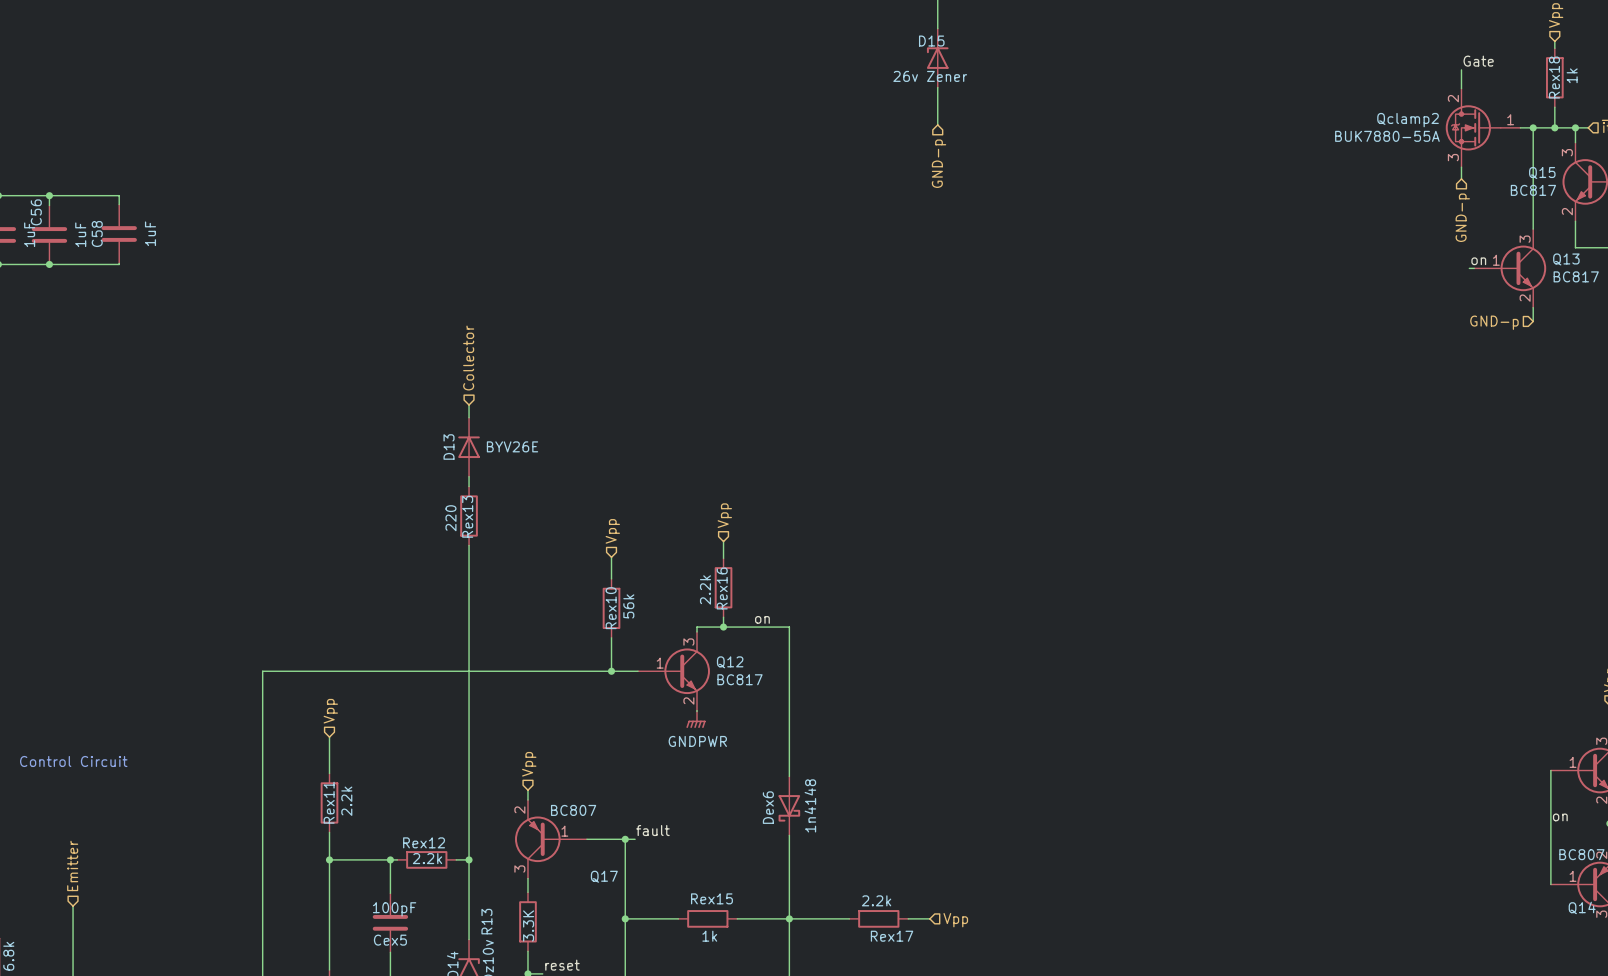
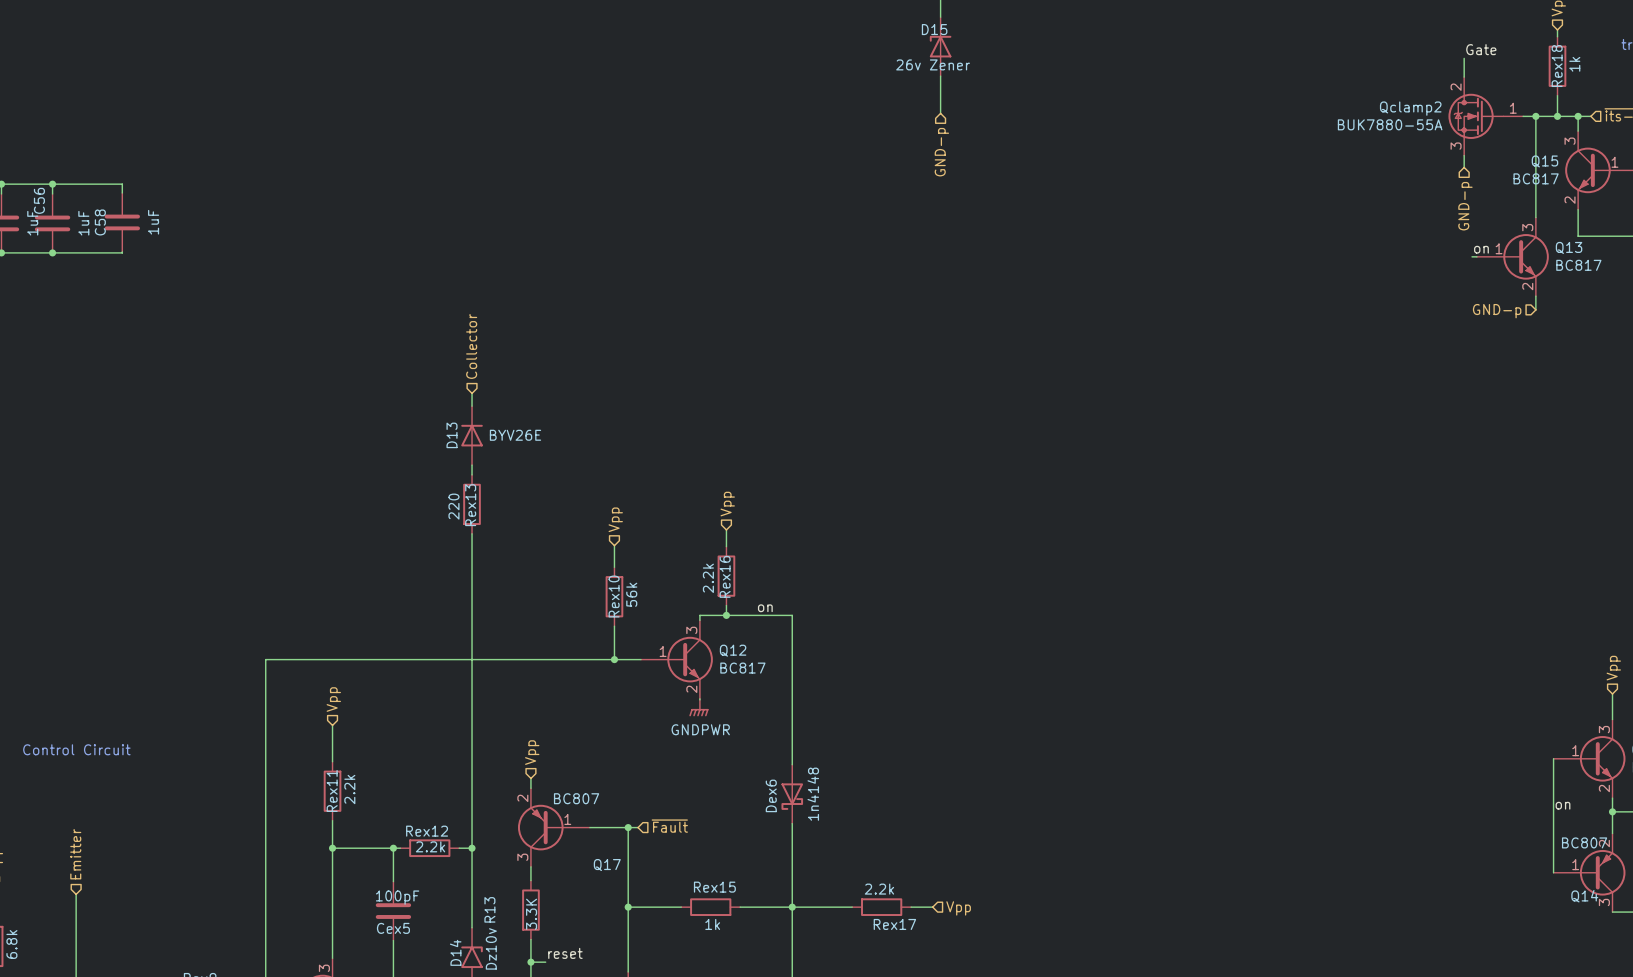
label: fault (652, 830) -> none
hierarchical label: none -> ~{Fault} (669, 826)

